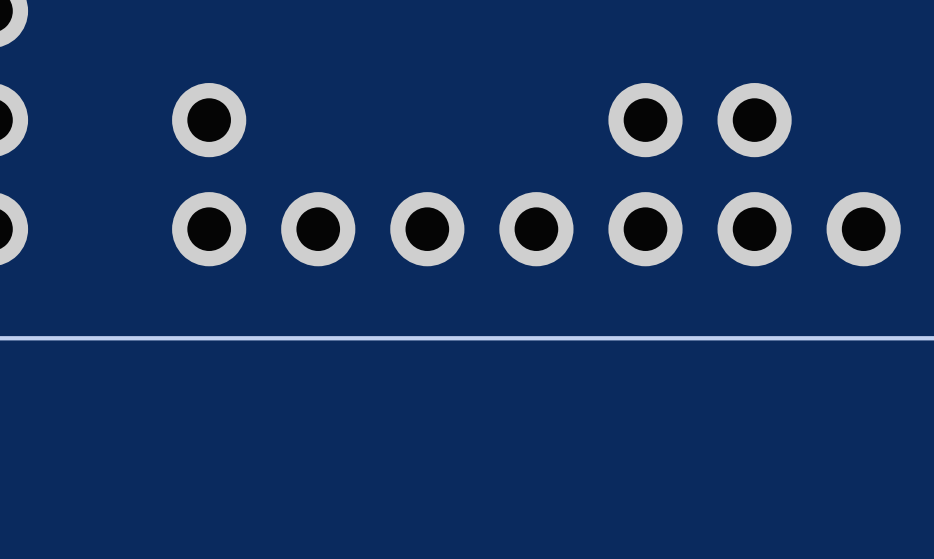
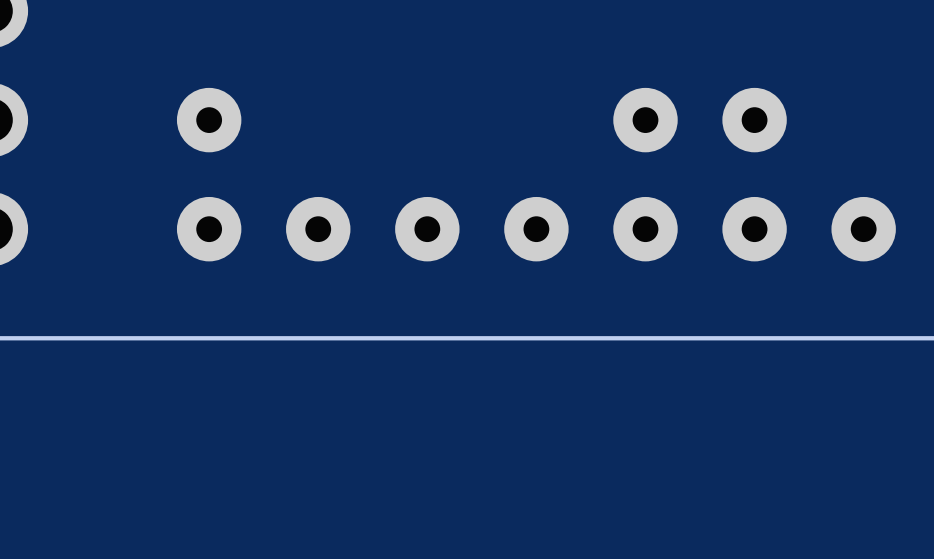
part footprint: [172, 83, 247, 158] -> [176, 87, 242, 153]
part footprint: [608, 83, 683, 158] -> [613, 87, 678, 153]
part footprint: [717, 83, 792, 158] -> [722, 87, 787, 153]
part footprint: [172, 192, 247, 267] -> [176, 196, 242, 262]
part footprint: [281, 192, 356, 267] -> [286, 196, 351, 262]
part footprint: [390, 192, 465, 267] -> [395, 196, 460, 262]
part footprint: [499, 192, 574, 267] -> [504, 196, 569, 262]
part footprint: [608, 192, 683, 267] -> [613, 196, 678, 262]
part footprint: [717, 192, 792, 267] -> [722, 196, 787, 262]
part footprint: [826, 192, 901, 267] -> [831, 196, 896, 262]

